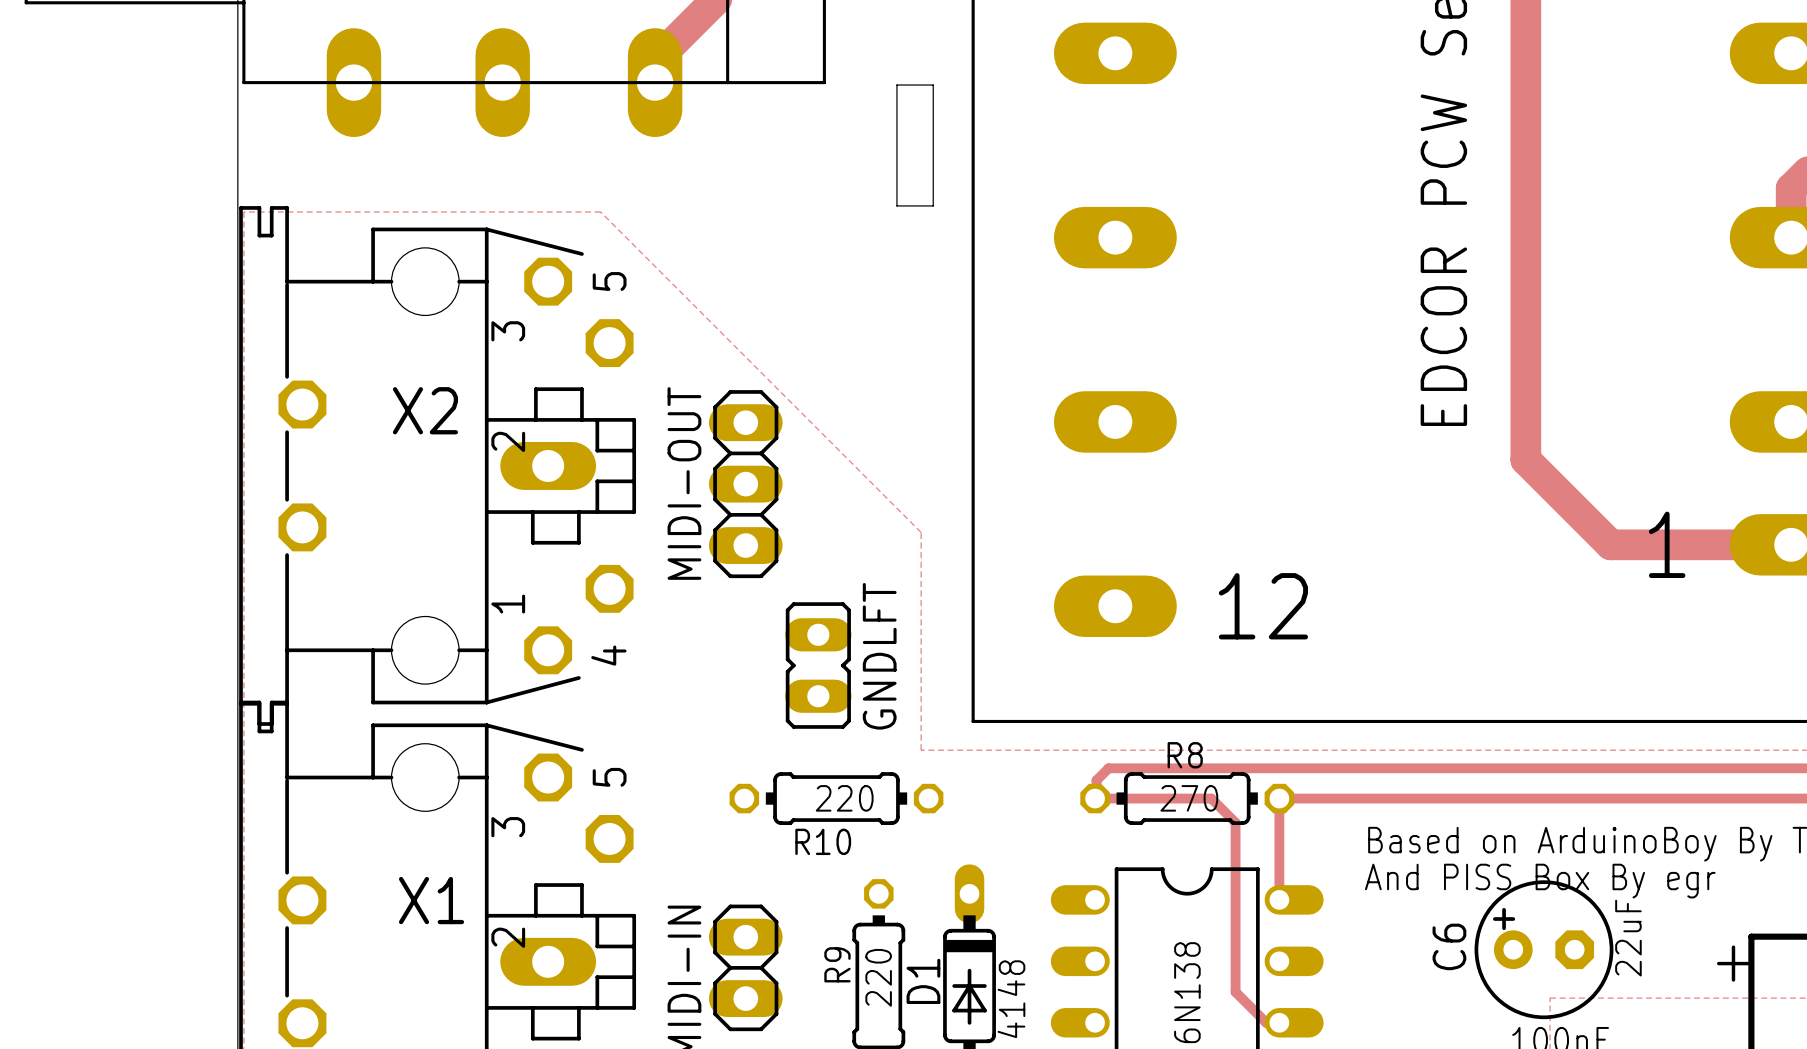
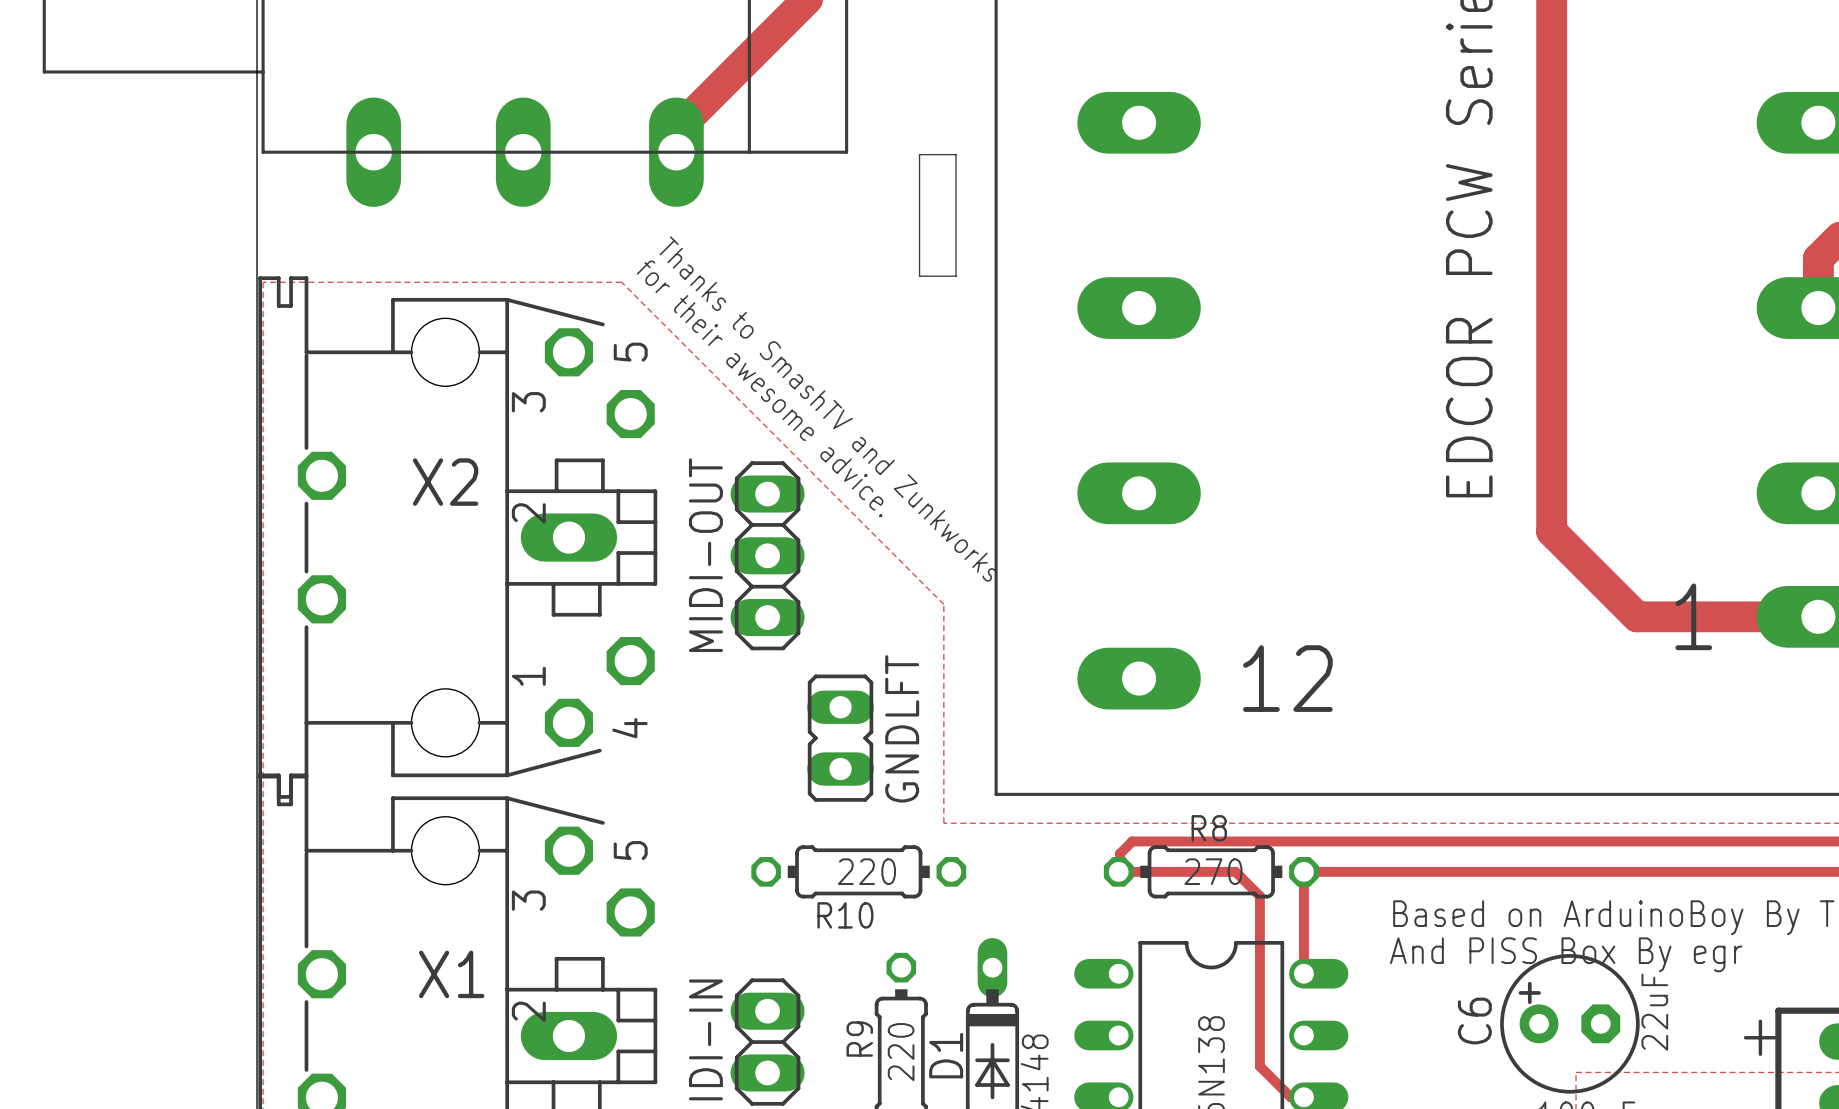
text: none -> for their awesome advice. (760, 388)
text: none -> Thanks to SmashTV and Zunkworks (828, 409)

